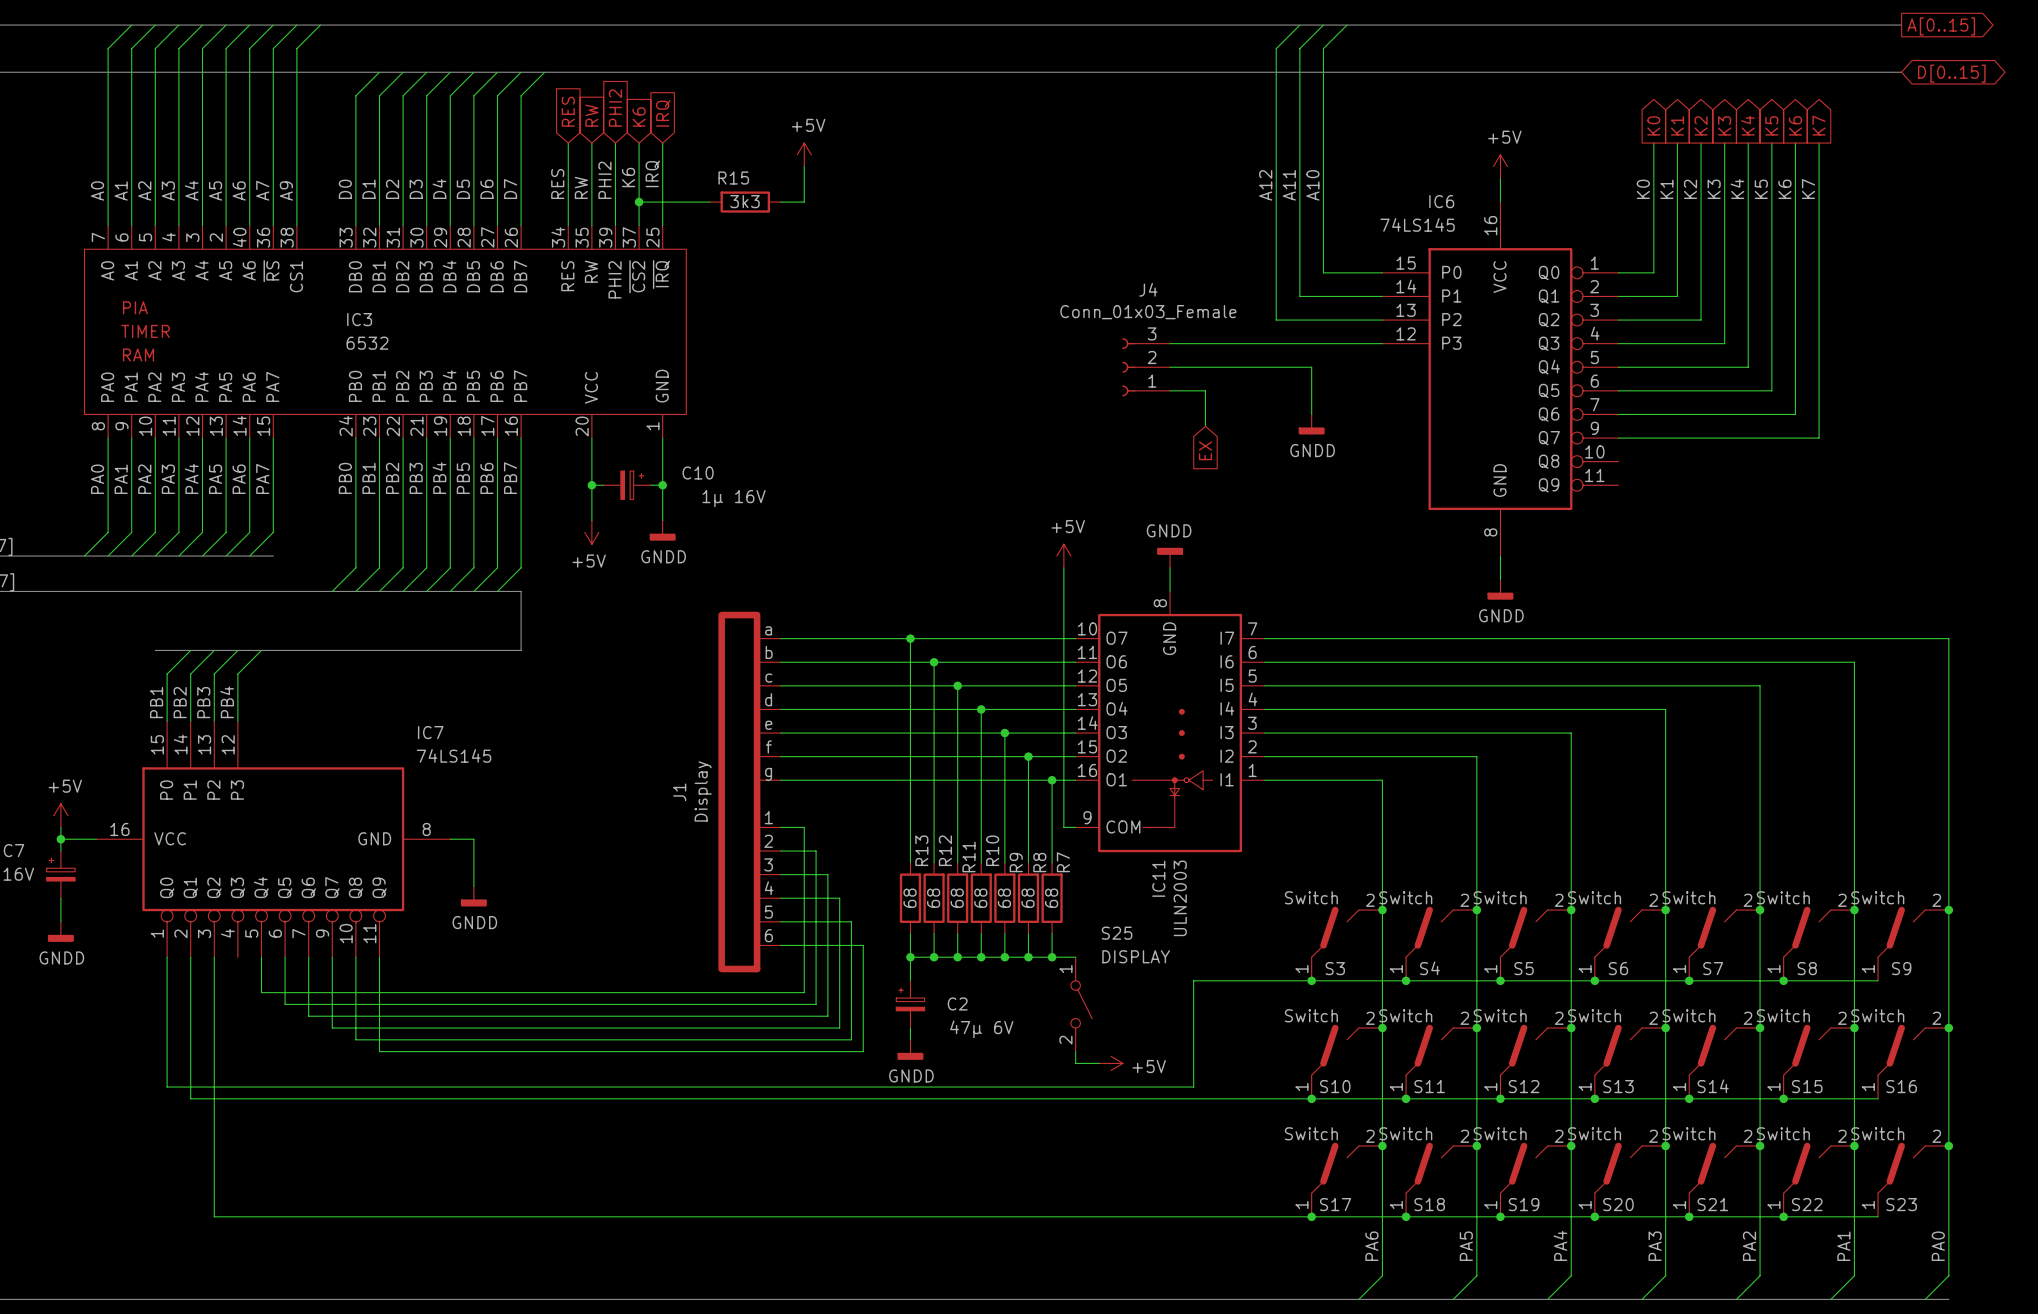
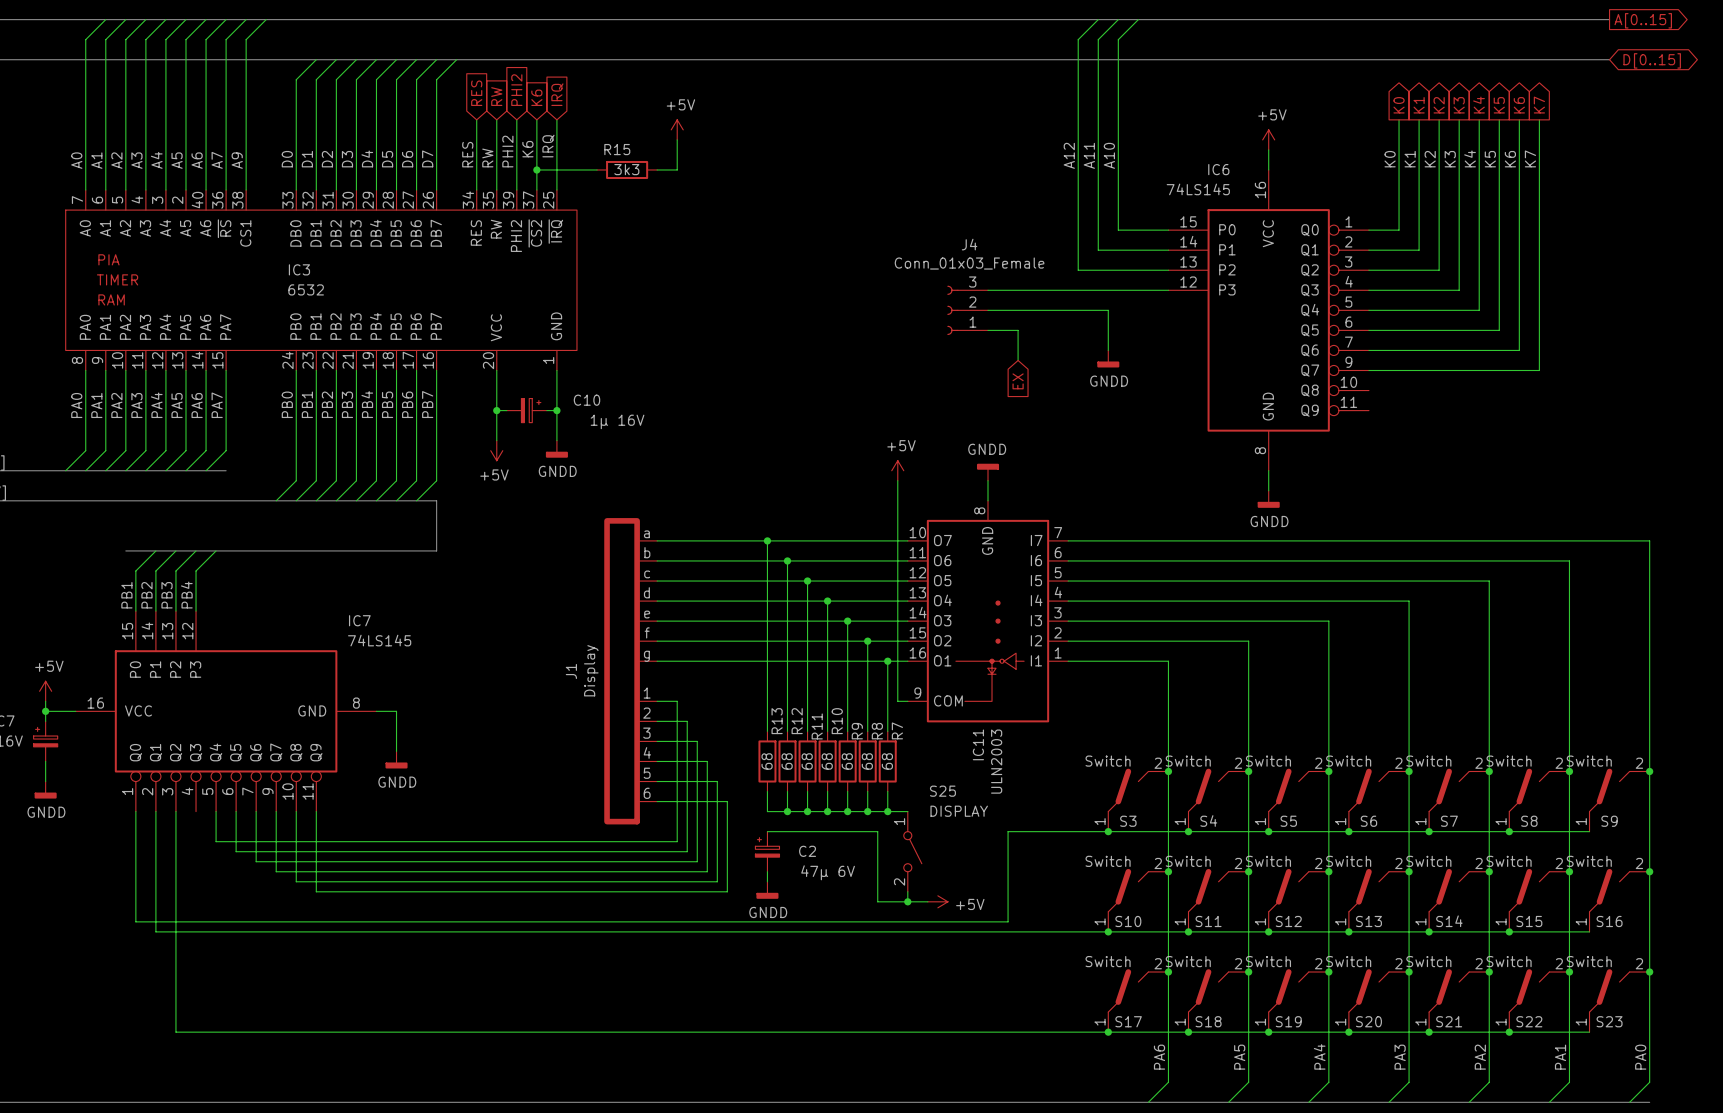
wire: (910, 957) (910, 980) -> (907, 901) (877, 901) (877, 831) (767, 831)
junction: (910, 957) -> none
junction: none -> (907, 901)

